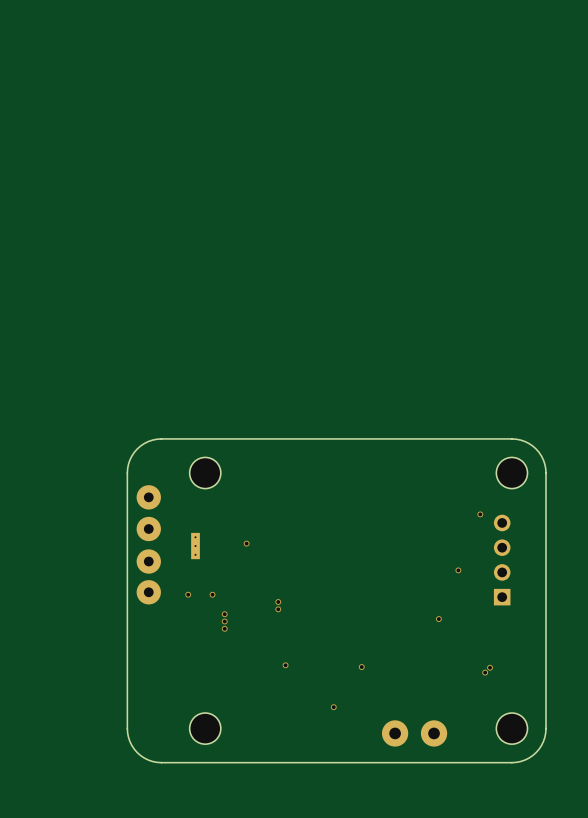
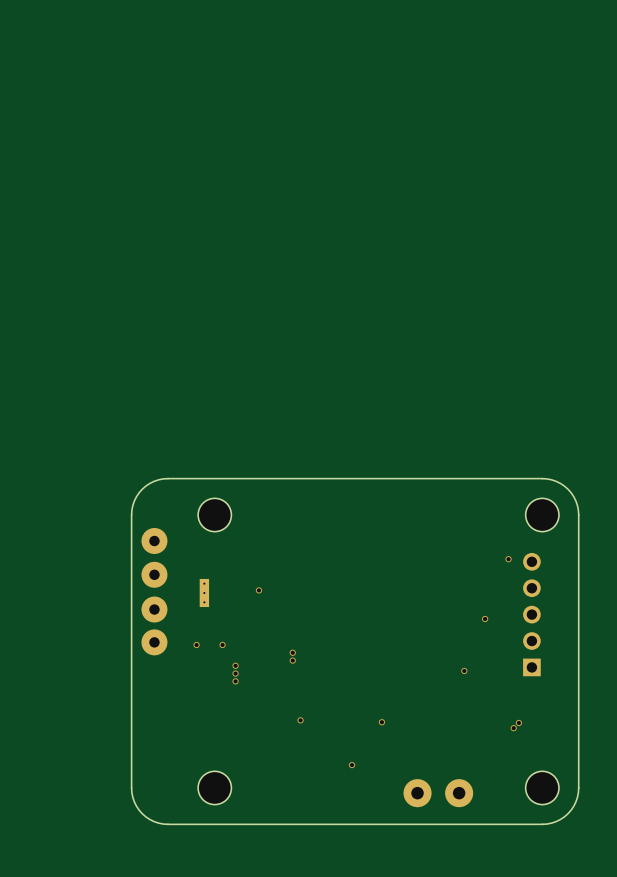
part footprint: [493, 514, 511, 606] -> [523, 552, 541, 677]

